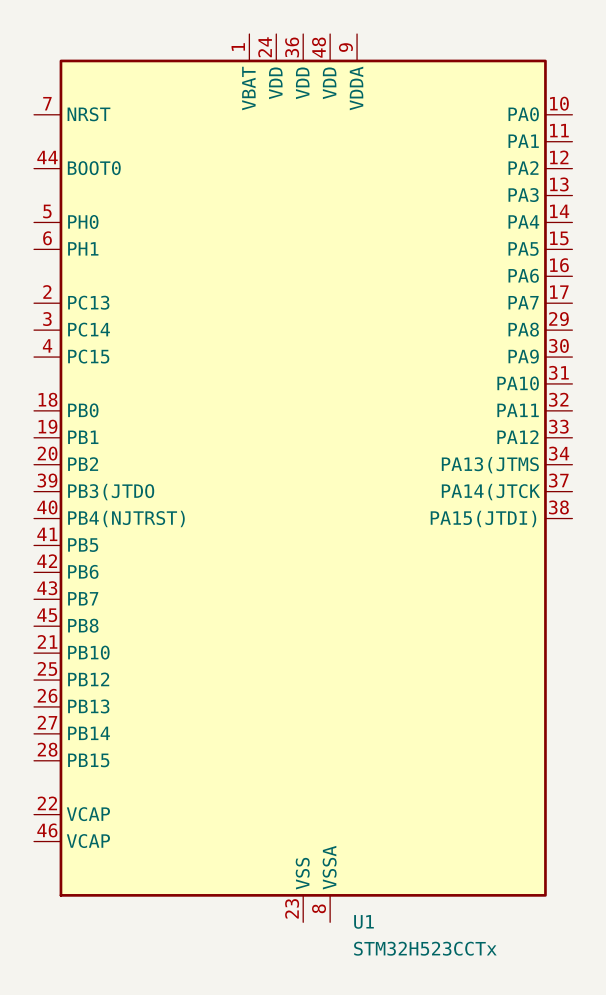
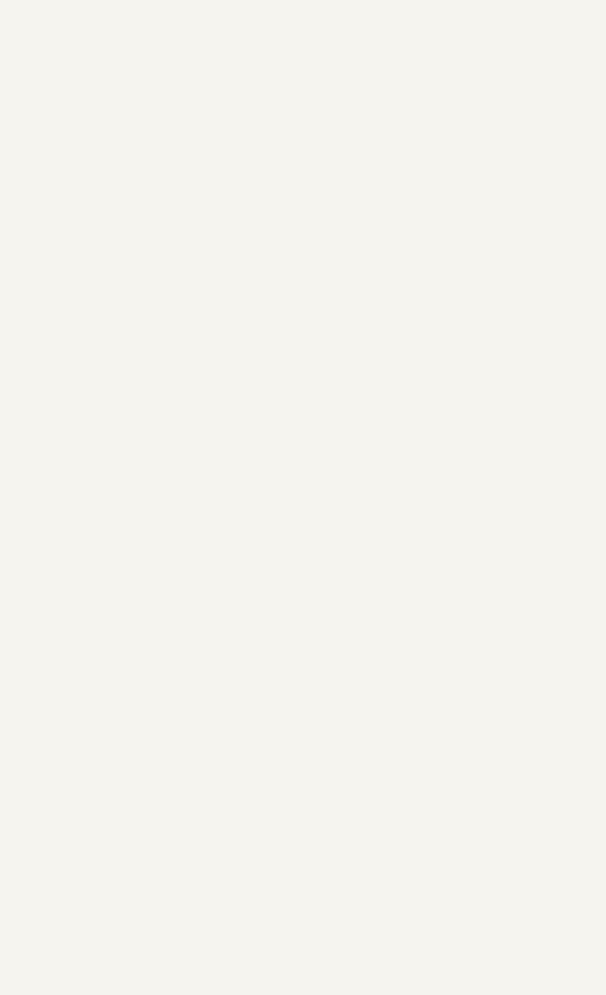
U1: STM32H523CCTx (303, 478) -> none

